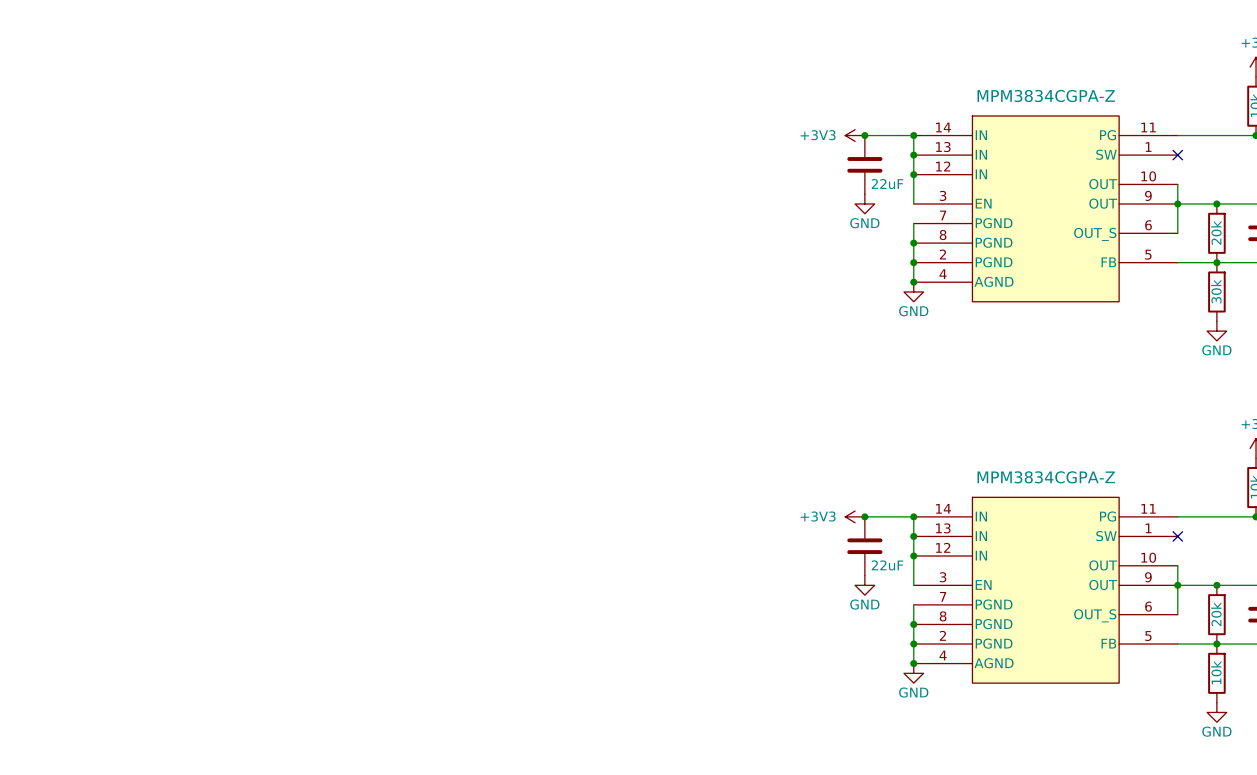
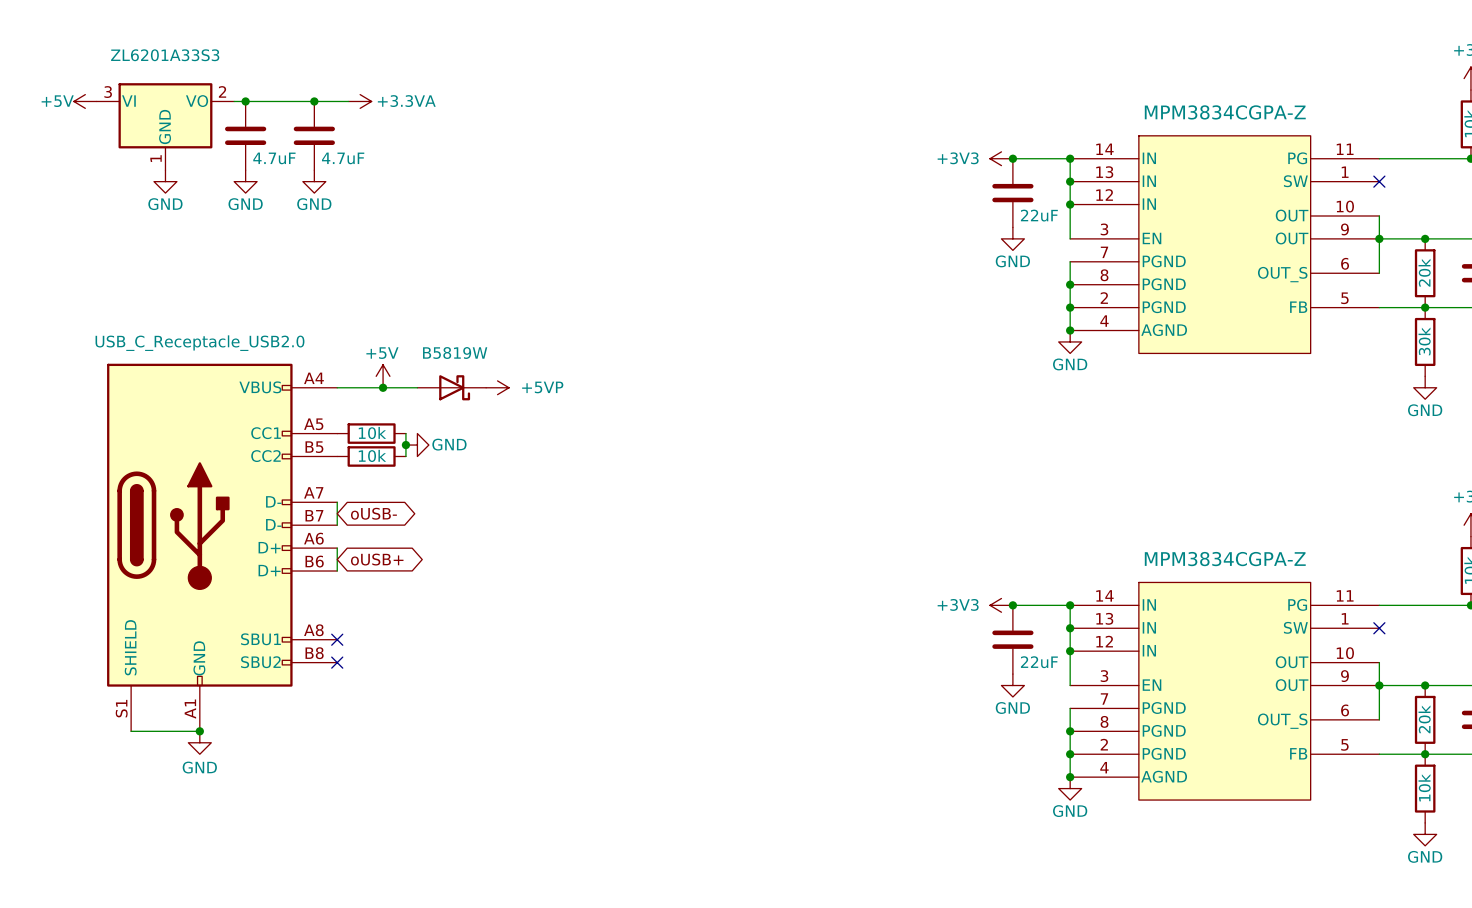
power symbol: none -> +5V (85, 101)
wire: none -> (234, 101) (348, 101)
junction: none -> (245, 101)
junction: none -> (314, 101)
power symbol: none -> +3.3VA (360, 101)
part: none -> ZL6201A33S3 (165, 126)
part: none -> 4.7uF (245, 135)
part: none -> 4.7uF (314, 135)
power symbol: none -> GND (165, 181)
power symbol: none -> GND (245, 181)
power symbol: none -> GND (314, 181)
power symbol: none -> +5V (383, 376)
wire: none -> (337, 387) (417, 387)
junction: none -> (383, 387)
part: none -> B5819W (451, 387)
power symbol: none -> +5VP (497, 387)
part: none -> 10k (371, 433)
wire: none -> (405, 433) (405, 456)
junction: none -> (405, 445)
power symbol: none -> GND (417, 445)
part: none -> 10k (371, 456)
wire: none -> (337, 502) (337, 525)
global label: none -> oUSB- (373, 513)
part: none -> USB_C_Receptacle_USB2.0 (222, 547)
wire: none -> (337, 548) (337, 571)
global label: none -> oUSB+ (377, 559)
no-connect mark: none -> (337, 639)
no-connect mark: none -> (337, 662)
wire: none -> (131, 731) (199, 731)
junction: none -> (199, 731)
power symbol: none -> GND (199, 742)

